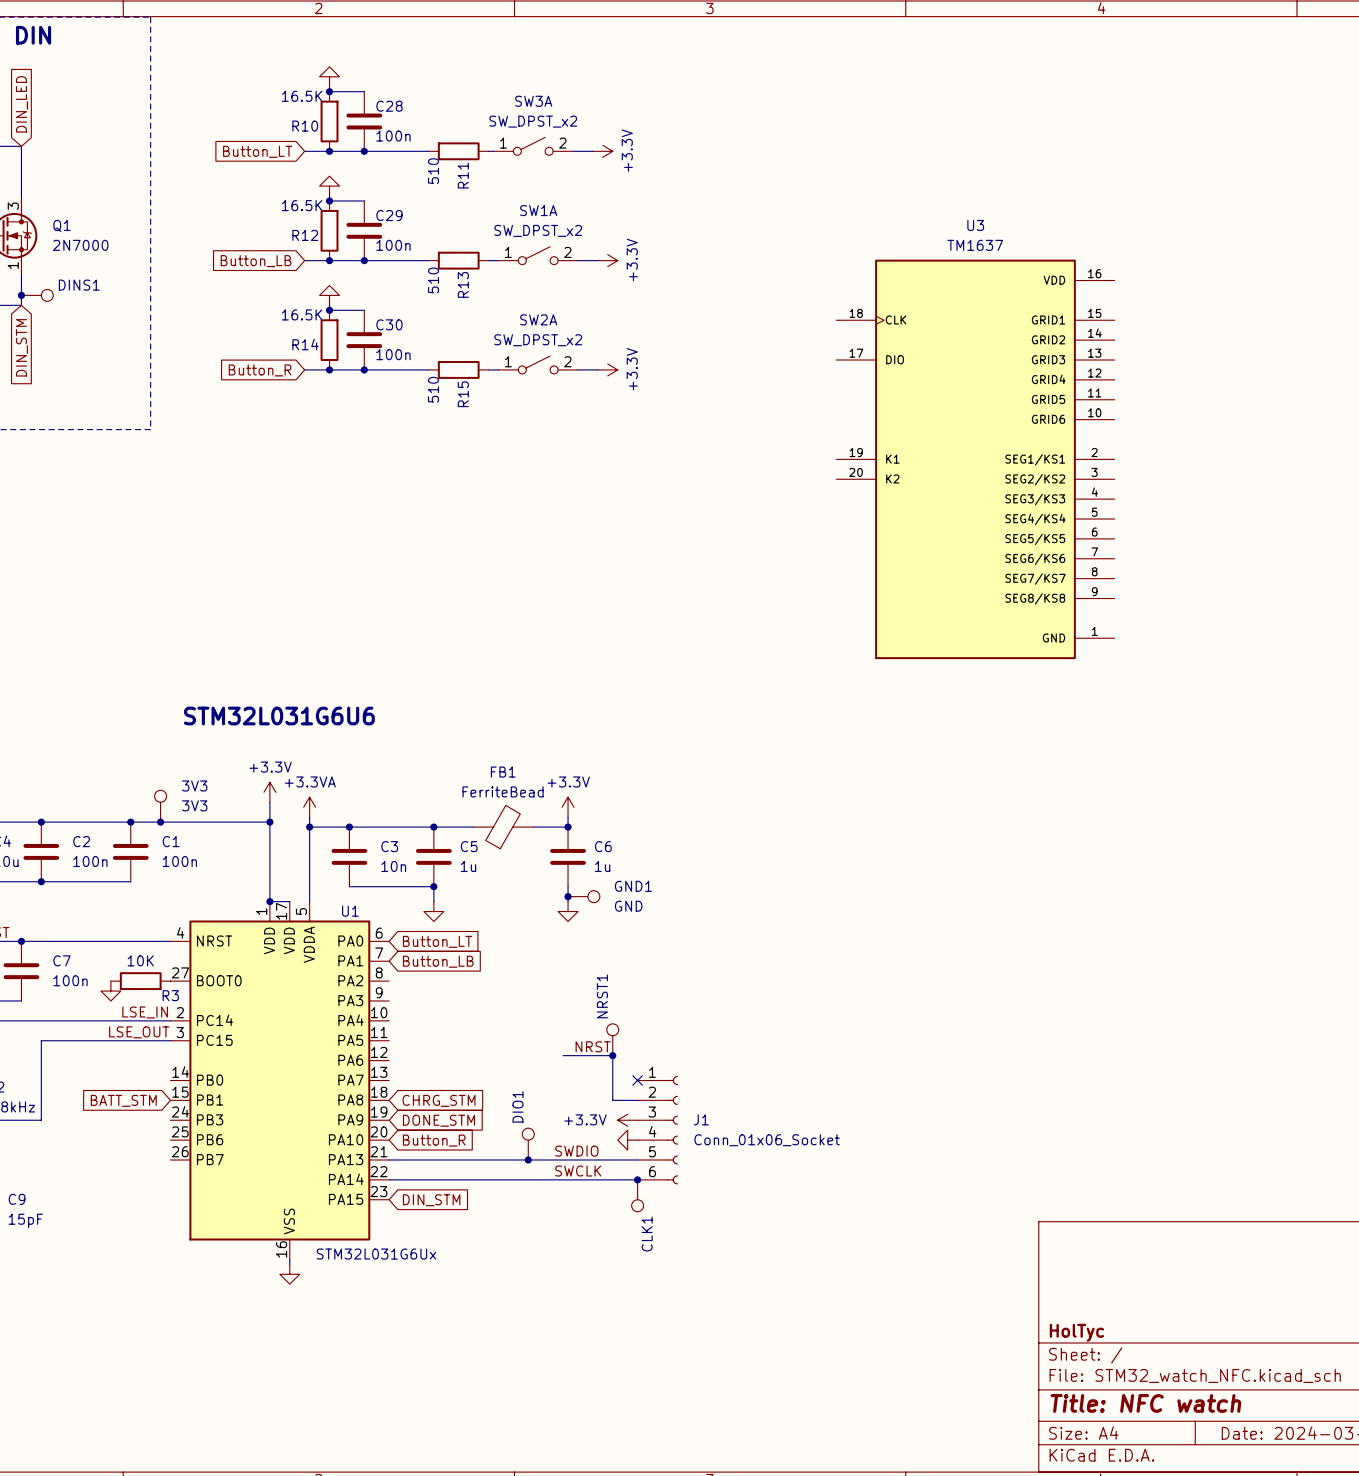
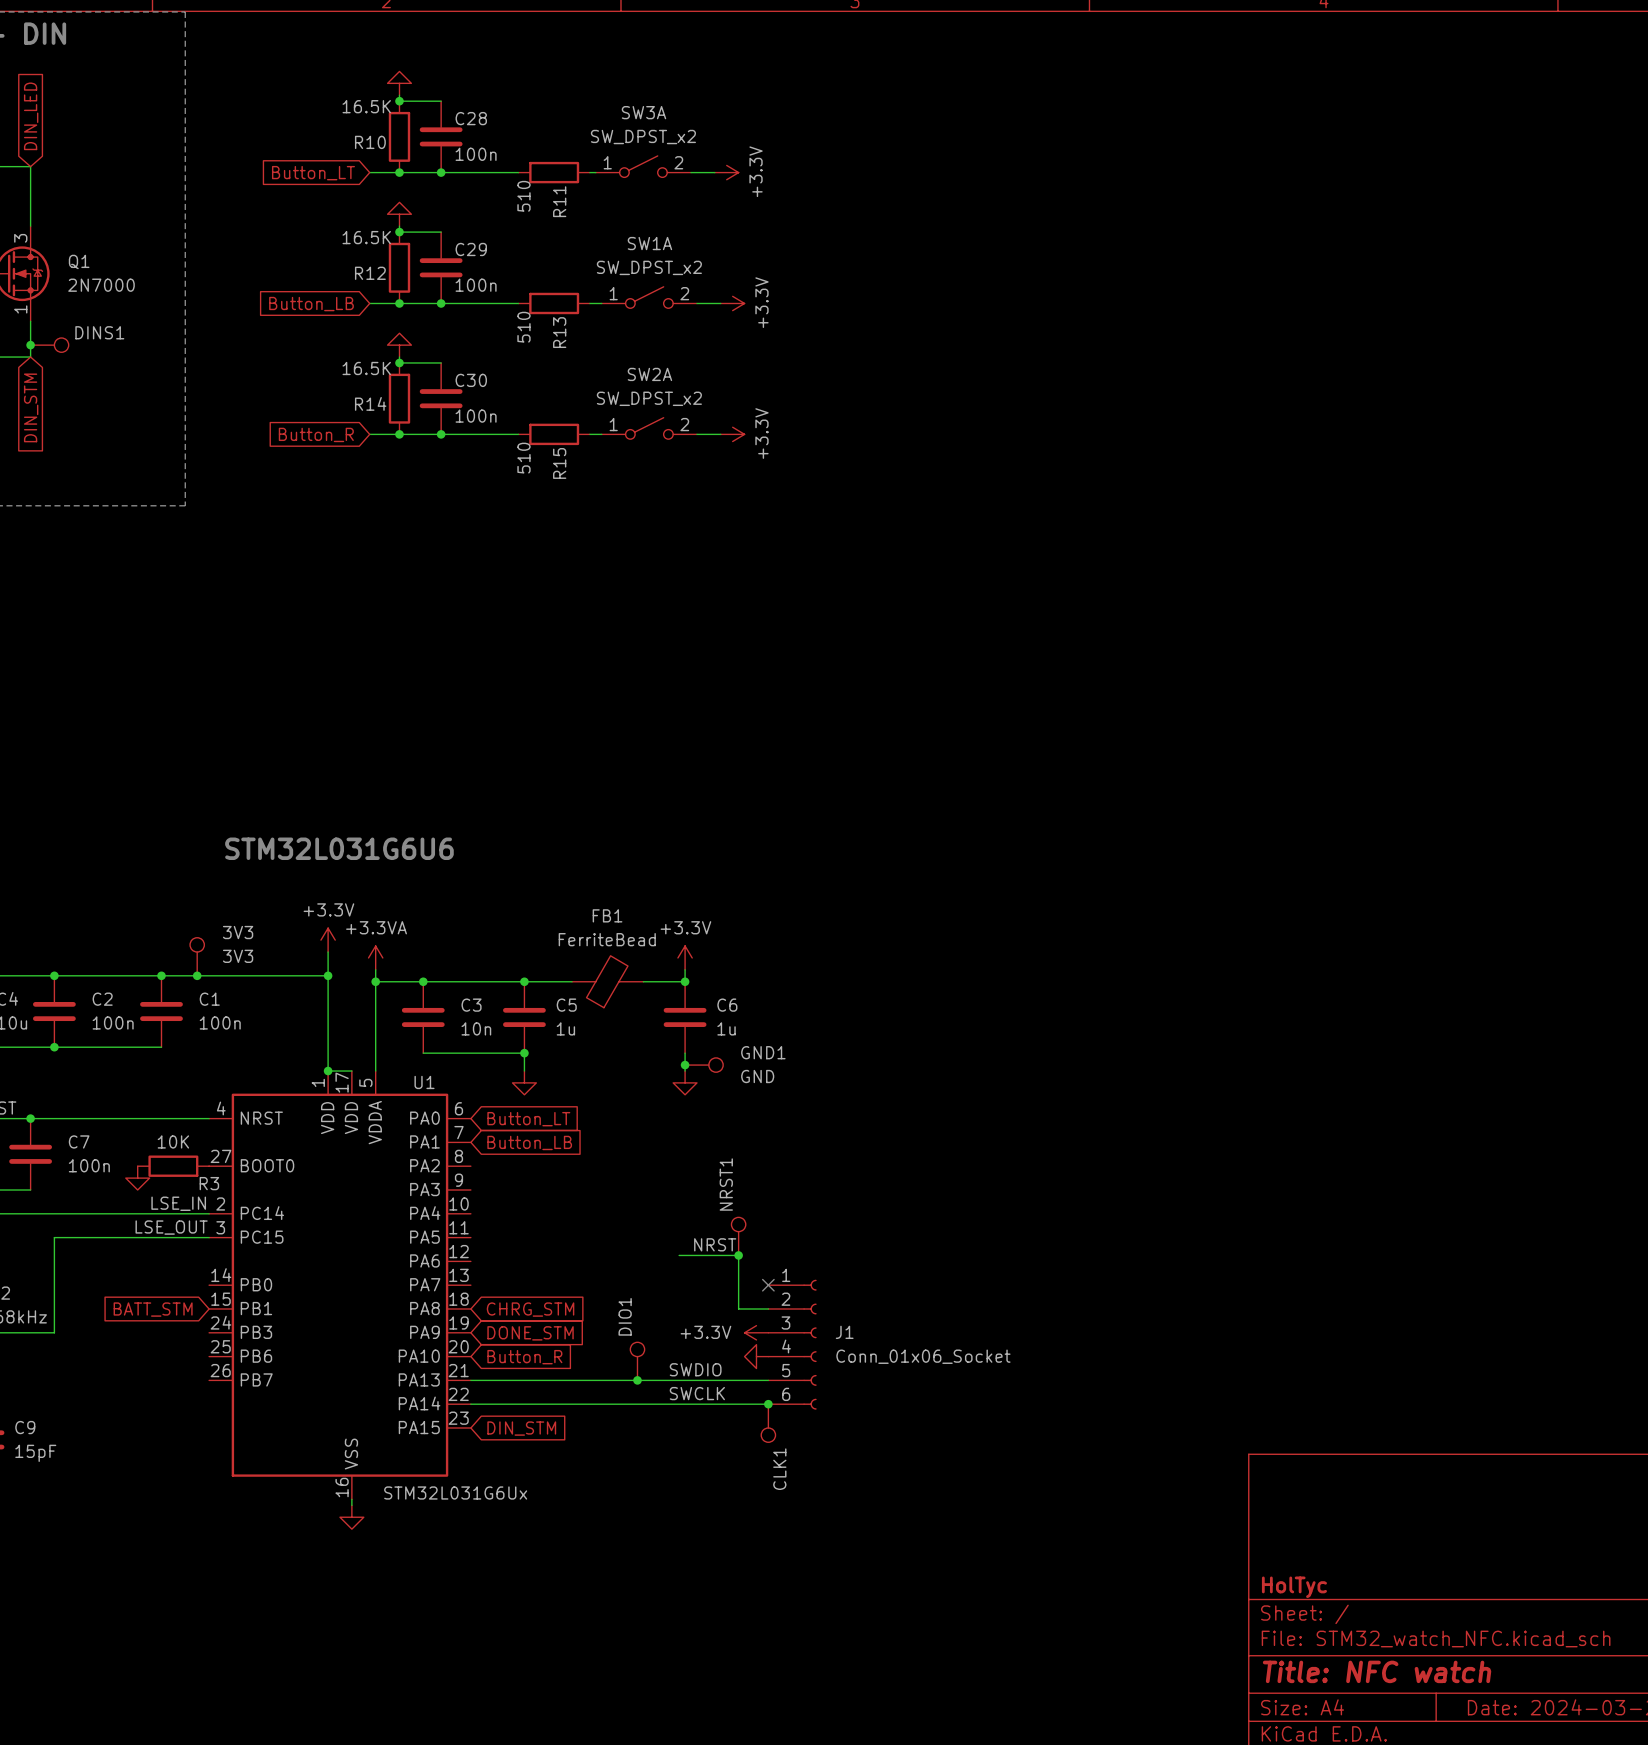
U3: TM1637 (975, 459) -> none

